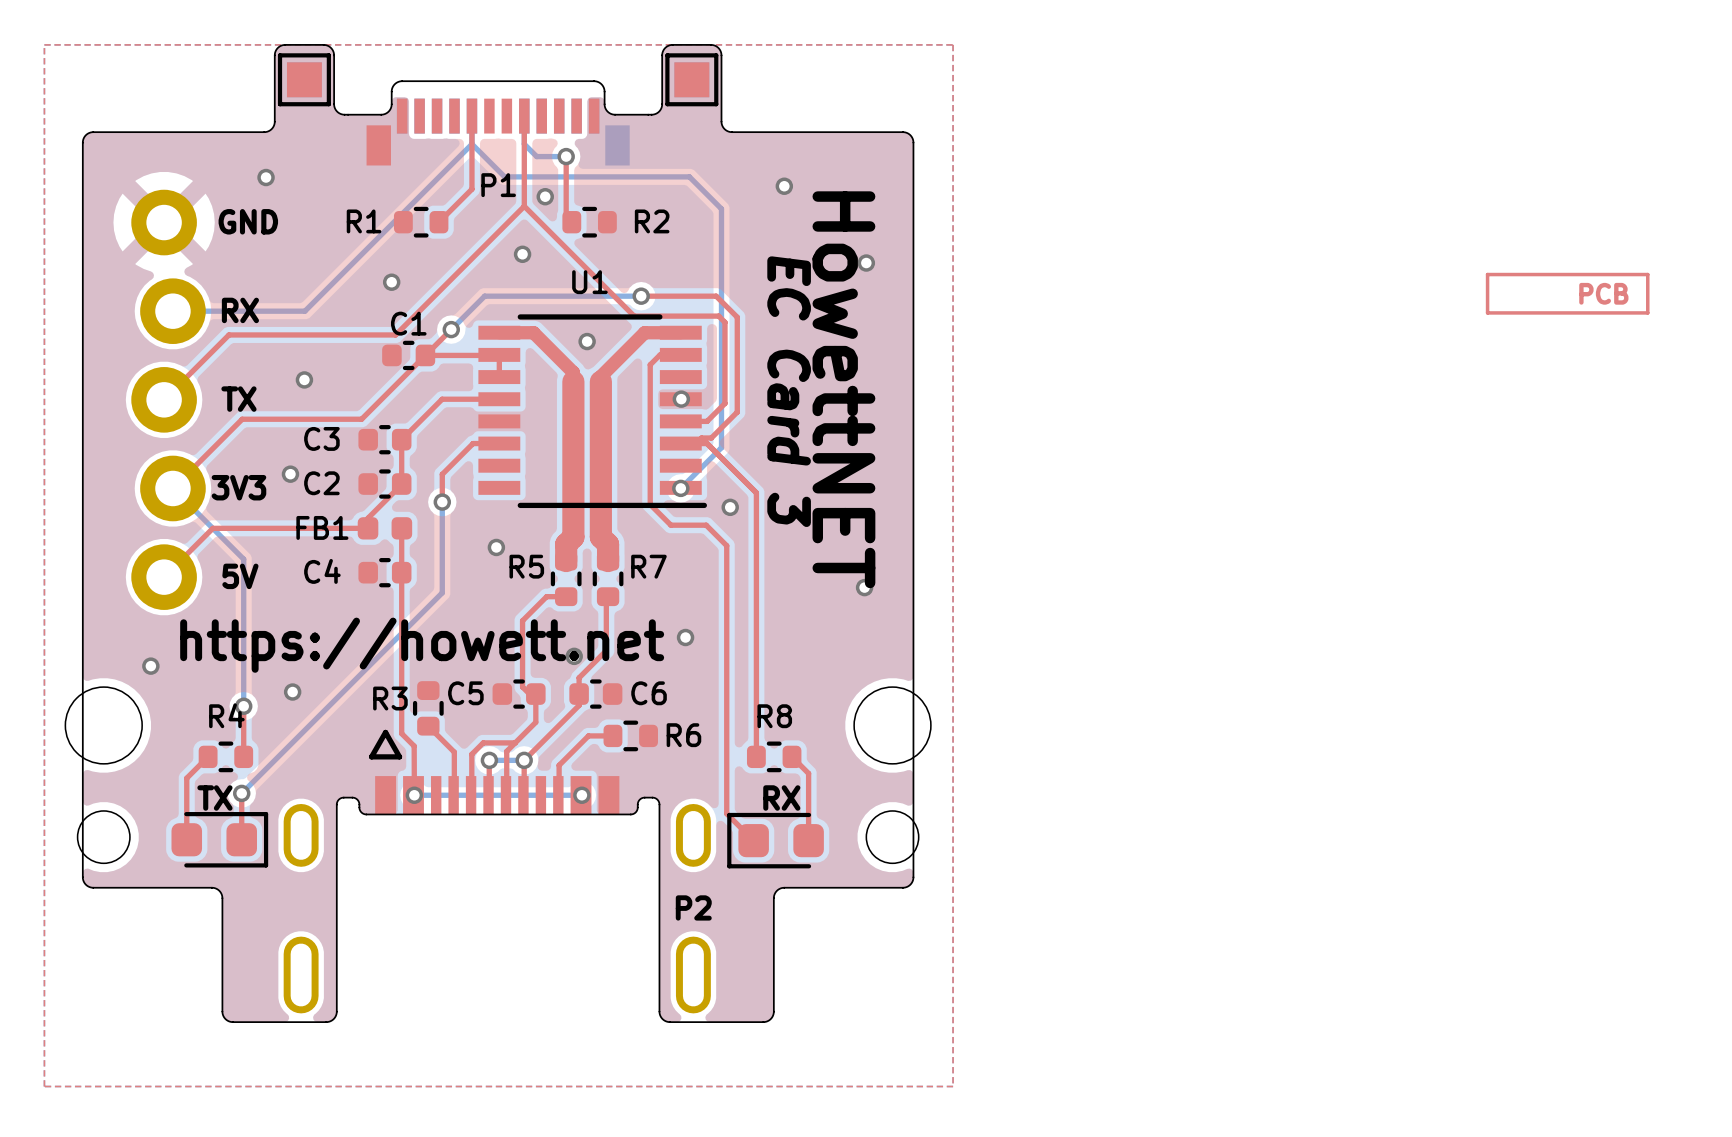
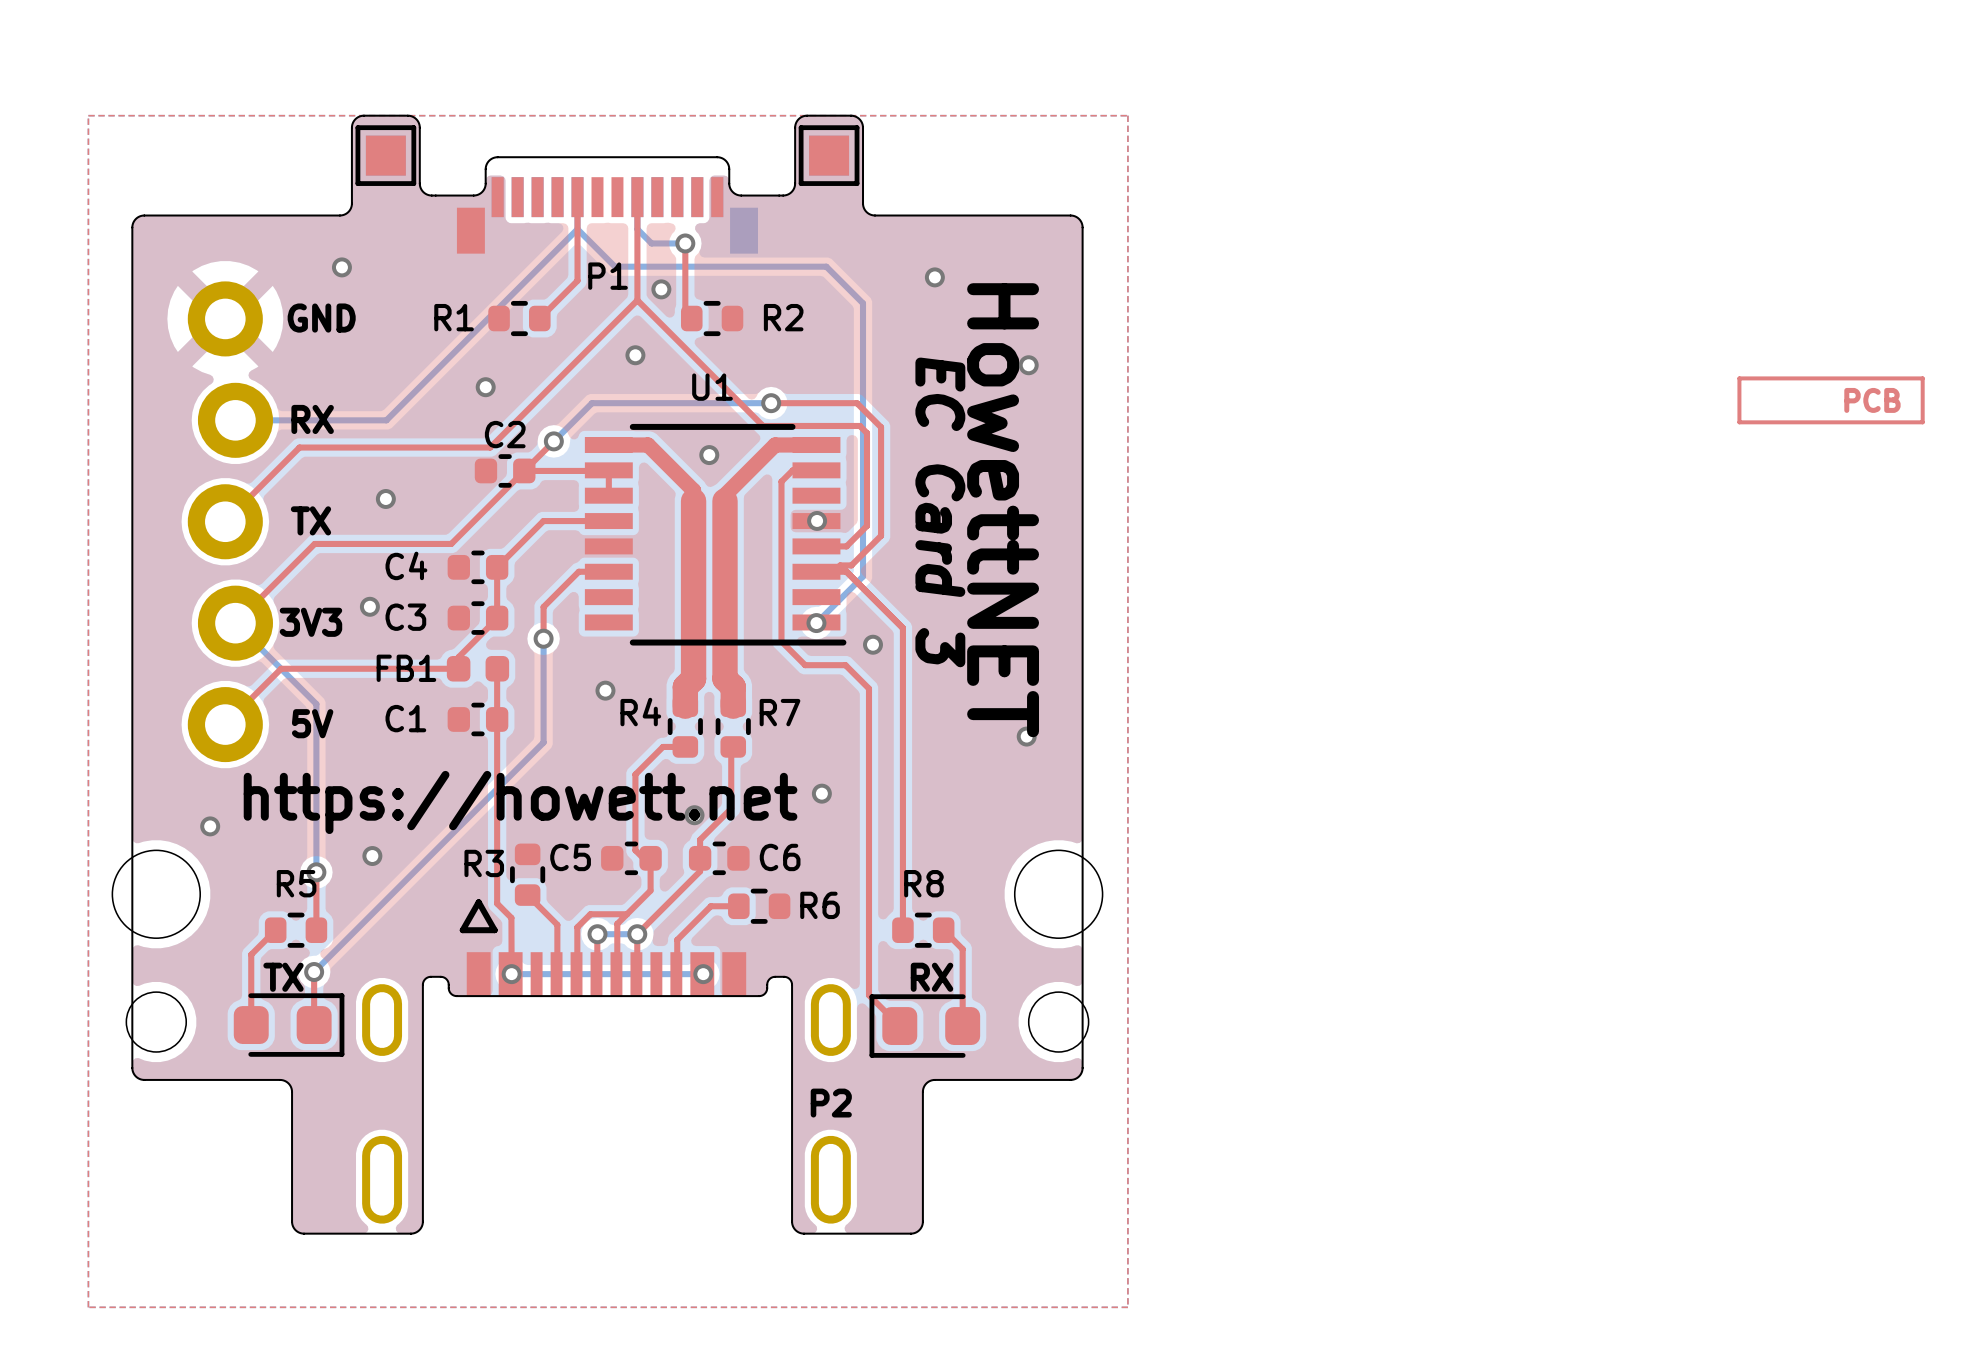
C1 name: C1 (408, 323) -> C2 (505, 434)
C3 name: C3 (321, 438) -> C4 (406, 565)
C2 name: C2 (321, 483) -> C3 (405, 617)
R5 name: R5 (526, 566) -> R4 (640, 712)
C4 name: C4 (322, 571) -> C1 (405, 718)
R4 name: R4 (226, 715) -> R5 (296, 883)

